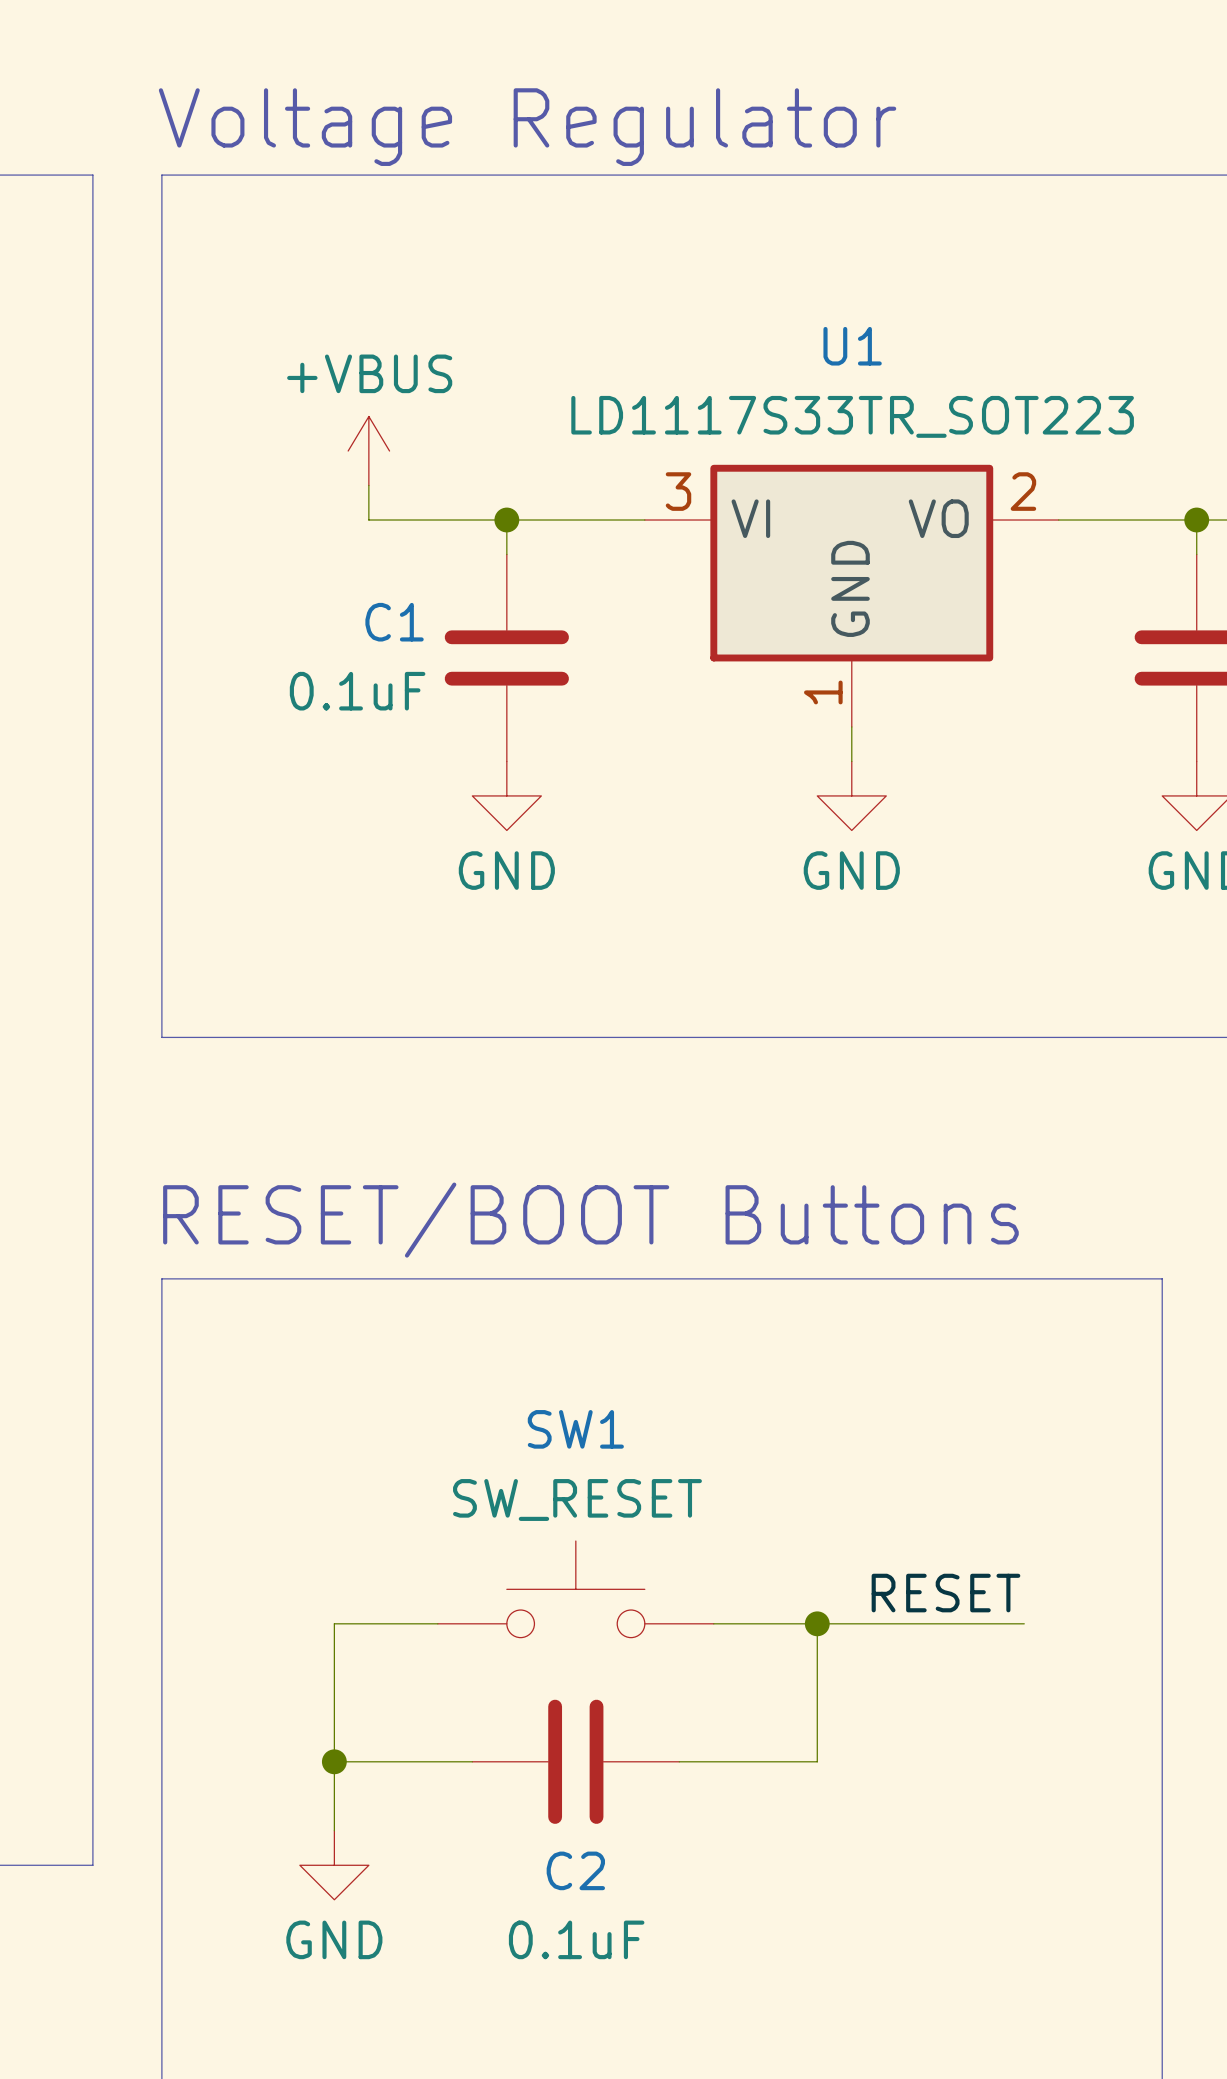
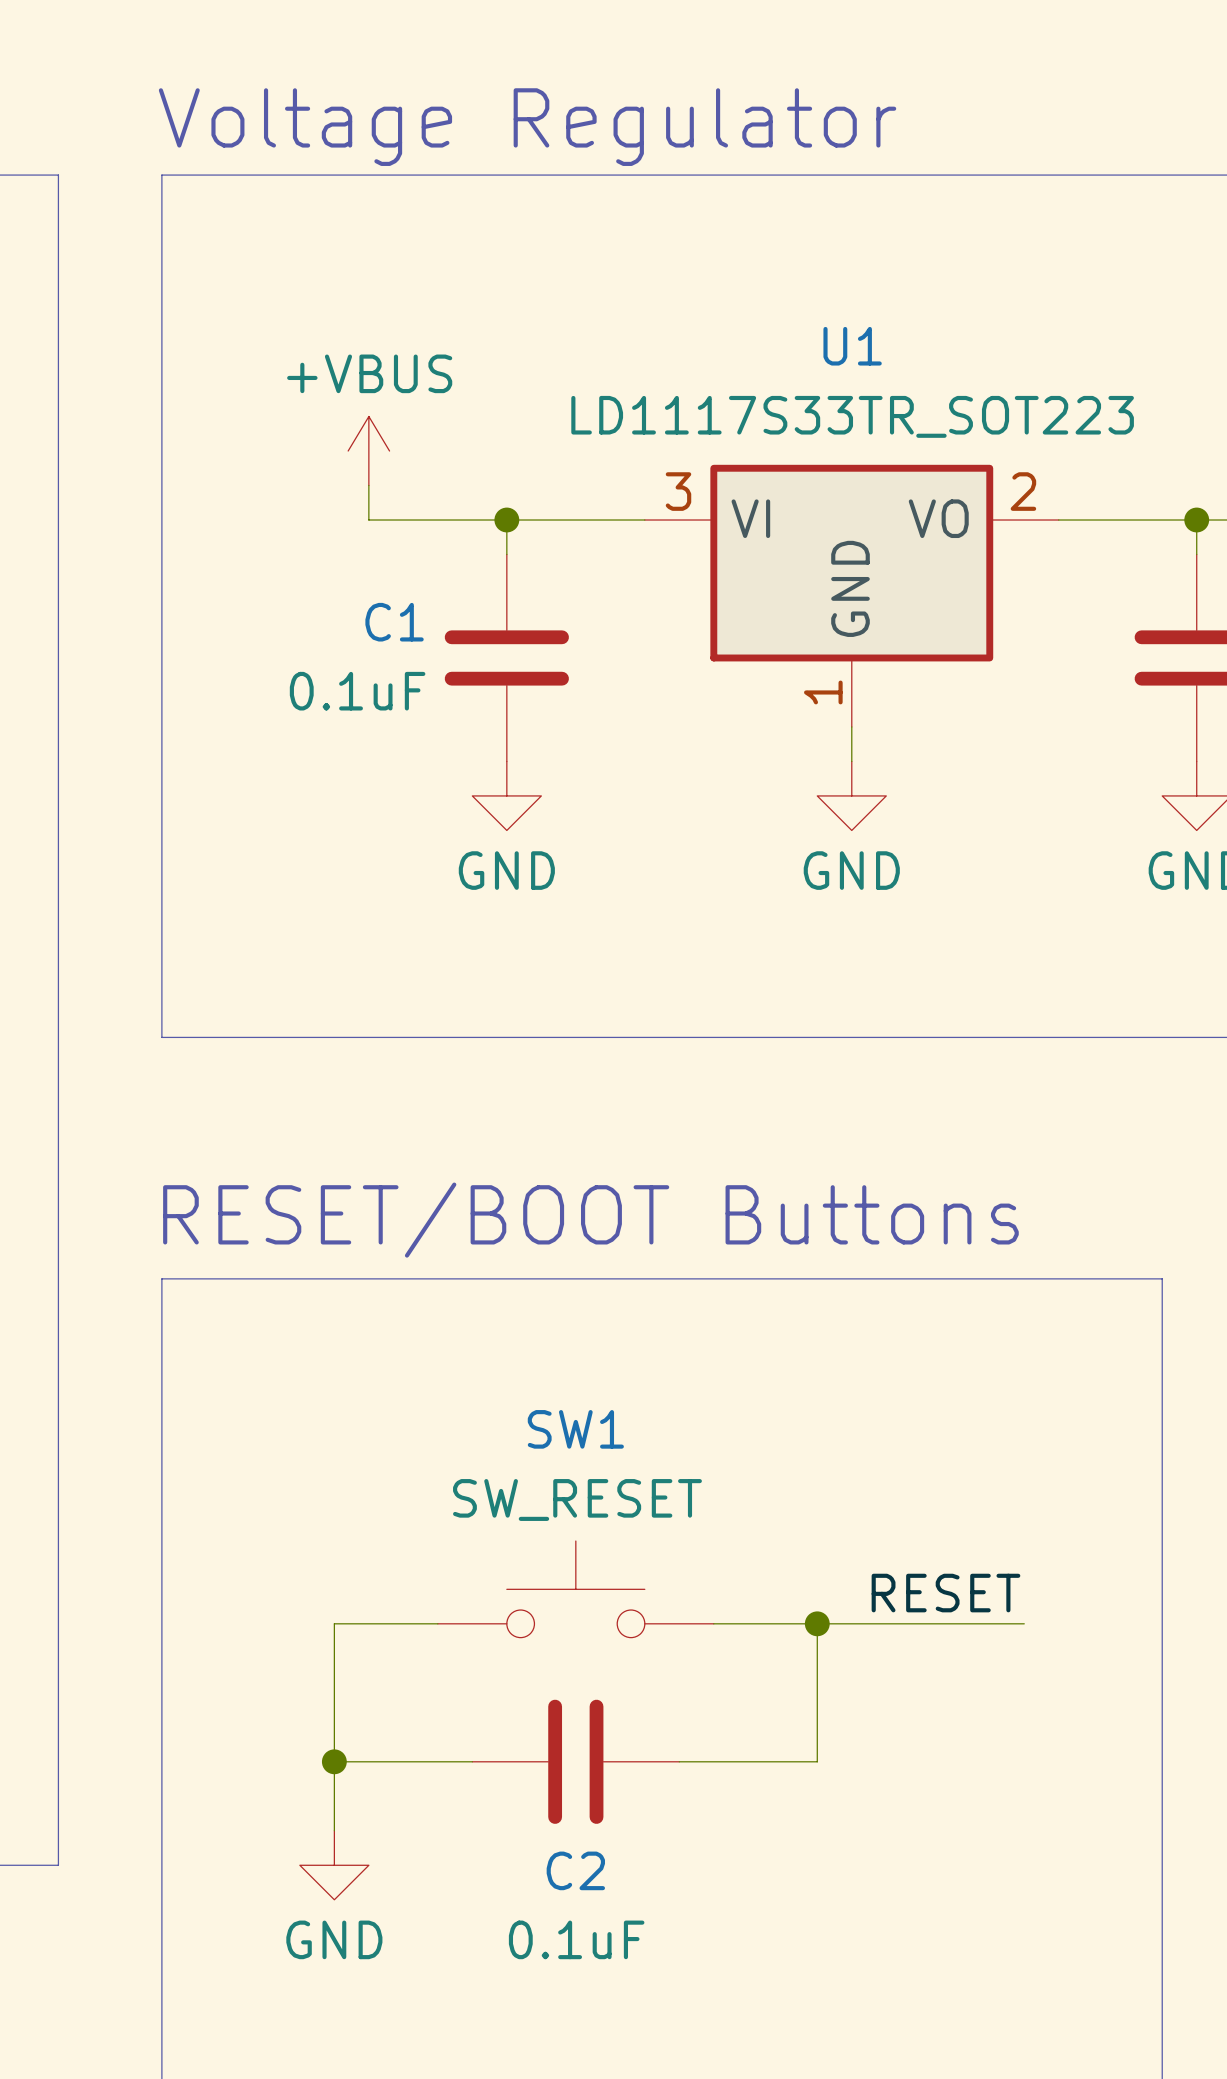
line: (58, 175) (92, 175) (92, 1865) (58, 1865) -> (58, 175) (58, 1865)

